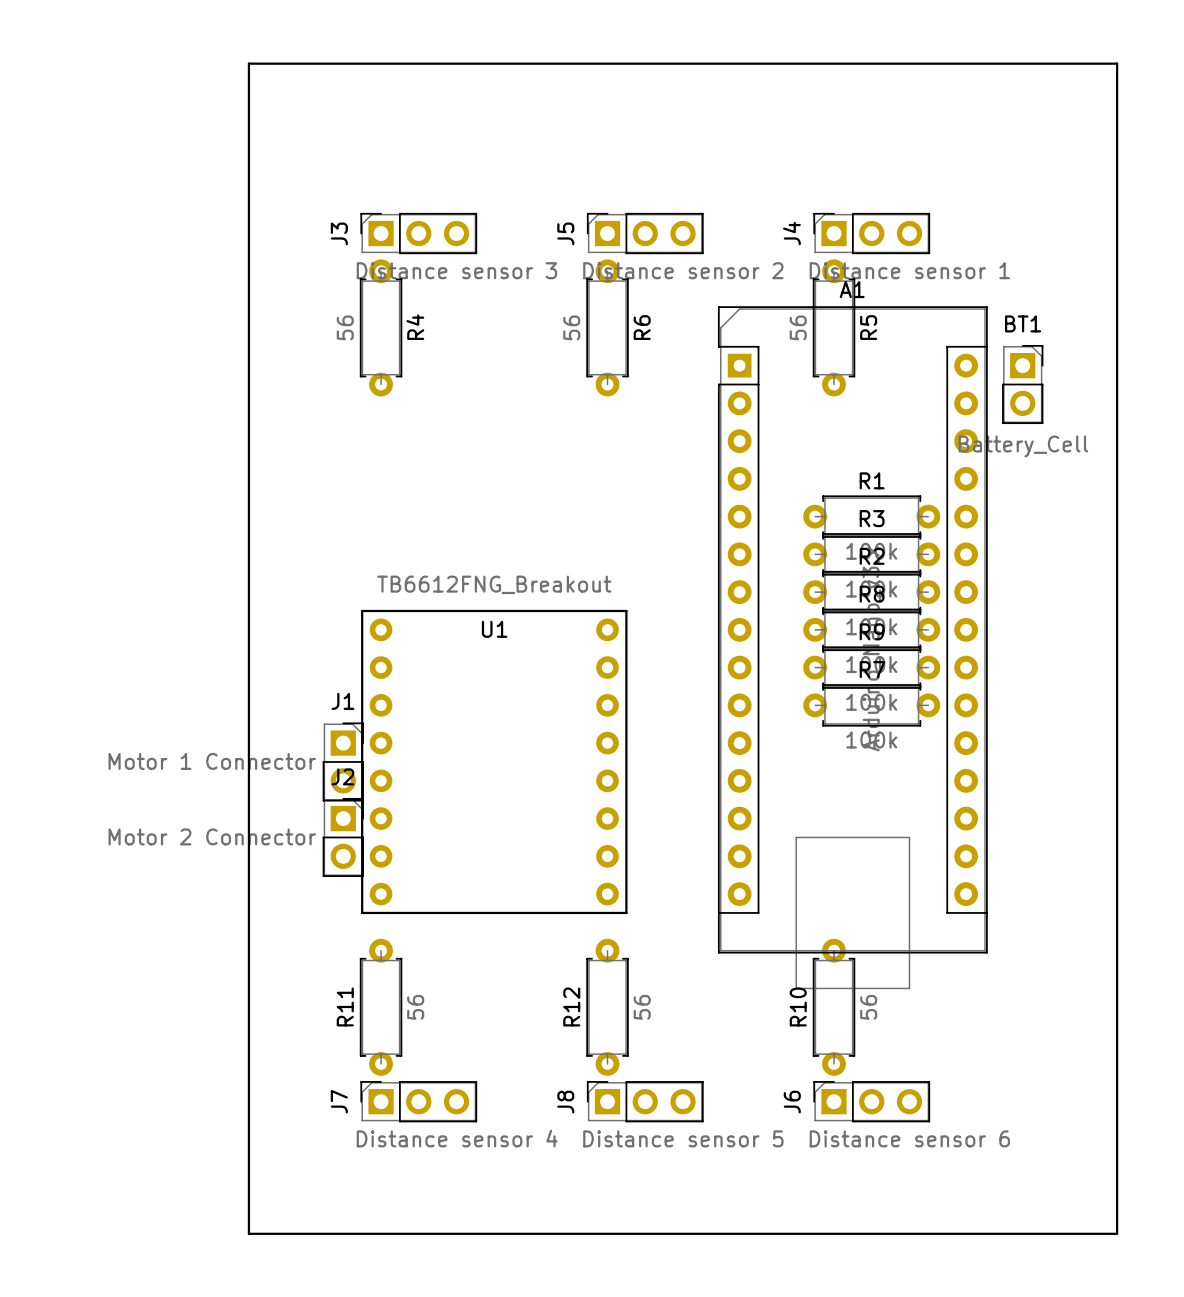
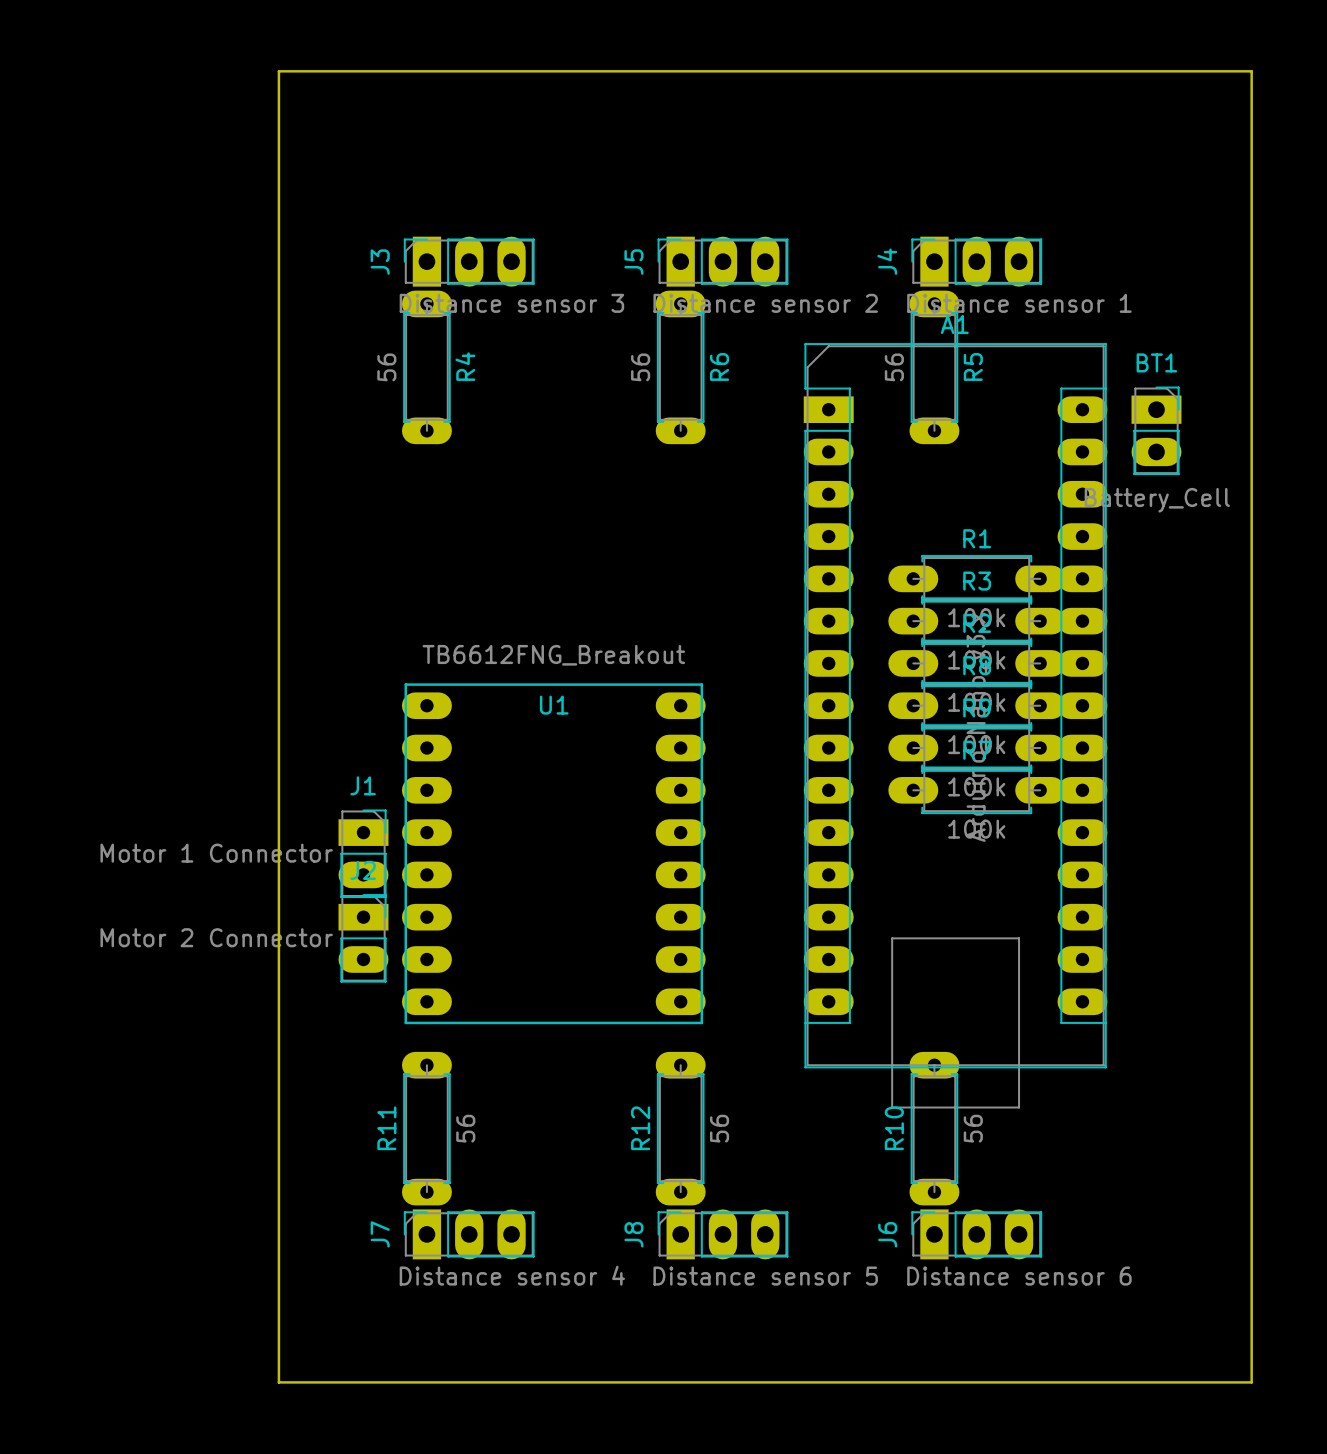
J3 footprint: [360, 212, 478, 255] -> [403, 236, 535, 287]
J5 footprint: [586, 212, 704, 255] -> [657, 236, 789, 287]
J4 footprint: [813, 212, 931, 255] -> [911, 236, 1043, 287]
R4 footprint: [359, 259, 403, 397] -> [401, 290, 452, 445]
R6 footprint: [586, 259, 629, 397] -> [655, 290, 706, 445]
R5 footprint: [812, 259, 856, 397] -> [909, 290, 960, 445]
A1 footprint: [717, 306, 988, 990] -> [803, 343, 1108, 1109]
BT1 footprint: [1002, 344, 1044, 425] -> [1131, 386, 1182, 476]
R1 footprint: [803, 495, 941, 538] -> [888, 555, 1066, 603]
R3 footprint: [803, 533, 941, 576] -> [888, 597, 1066, 645]
R2 footprint: [803, 570, 941, 614] -> [888, 639, 1066, 688]
R8 footprint: [803, 608, 941, 652] -> [888, 681, 1066, 730]
U1 footprint: [361, 609, 628, 915] -> [401, 683, 706, 1025]
R9 footprint: [803, 646, 941, 689] -> [888, 724, 1066, 772]
R7 footprint: [803, 684, 941, 727] -> [888, 766, 1066, 815]
J1 footprint: [322, 722, 364, 802] -> [338, 809, 389, 899]
J2 footprint: [322, 797, 364, 878] -> [338, 894, 389, 983]
R11 footprint: [359, 938, 403, 1076] -> [401, 1051, 452, 1206]
R12 footprint: [586, 938, 629, 1076] -> [655, 1051, 706, 1206]
R10 footprint: [812, 938, 856, 1076] -> [909, 1051, 960, 1206]
J7 footprint: [360, 1081, 478, 1123] -> [403, 1209, 535, 1260]
J8 footprint: [586, 1081, 704, 1123] -> [657, 1209, 789, 1260]
J6 footprint: [813, 1081, 931, 1123] -> [911, 1209, 1043, 1260]

